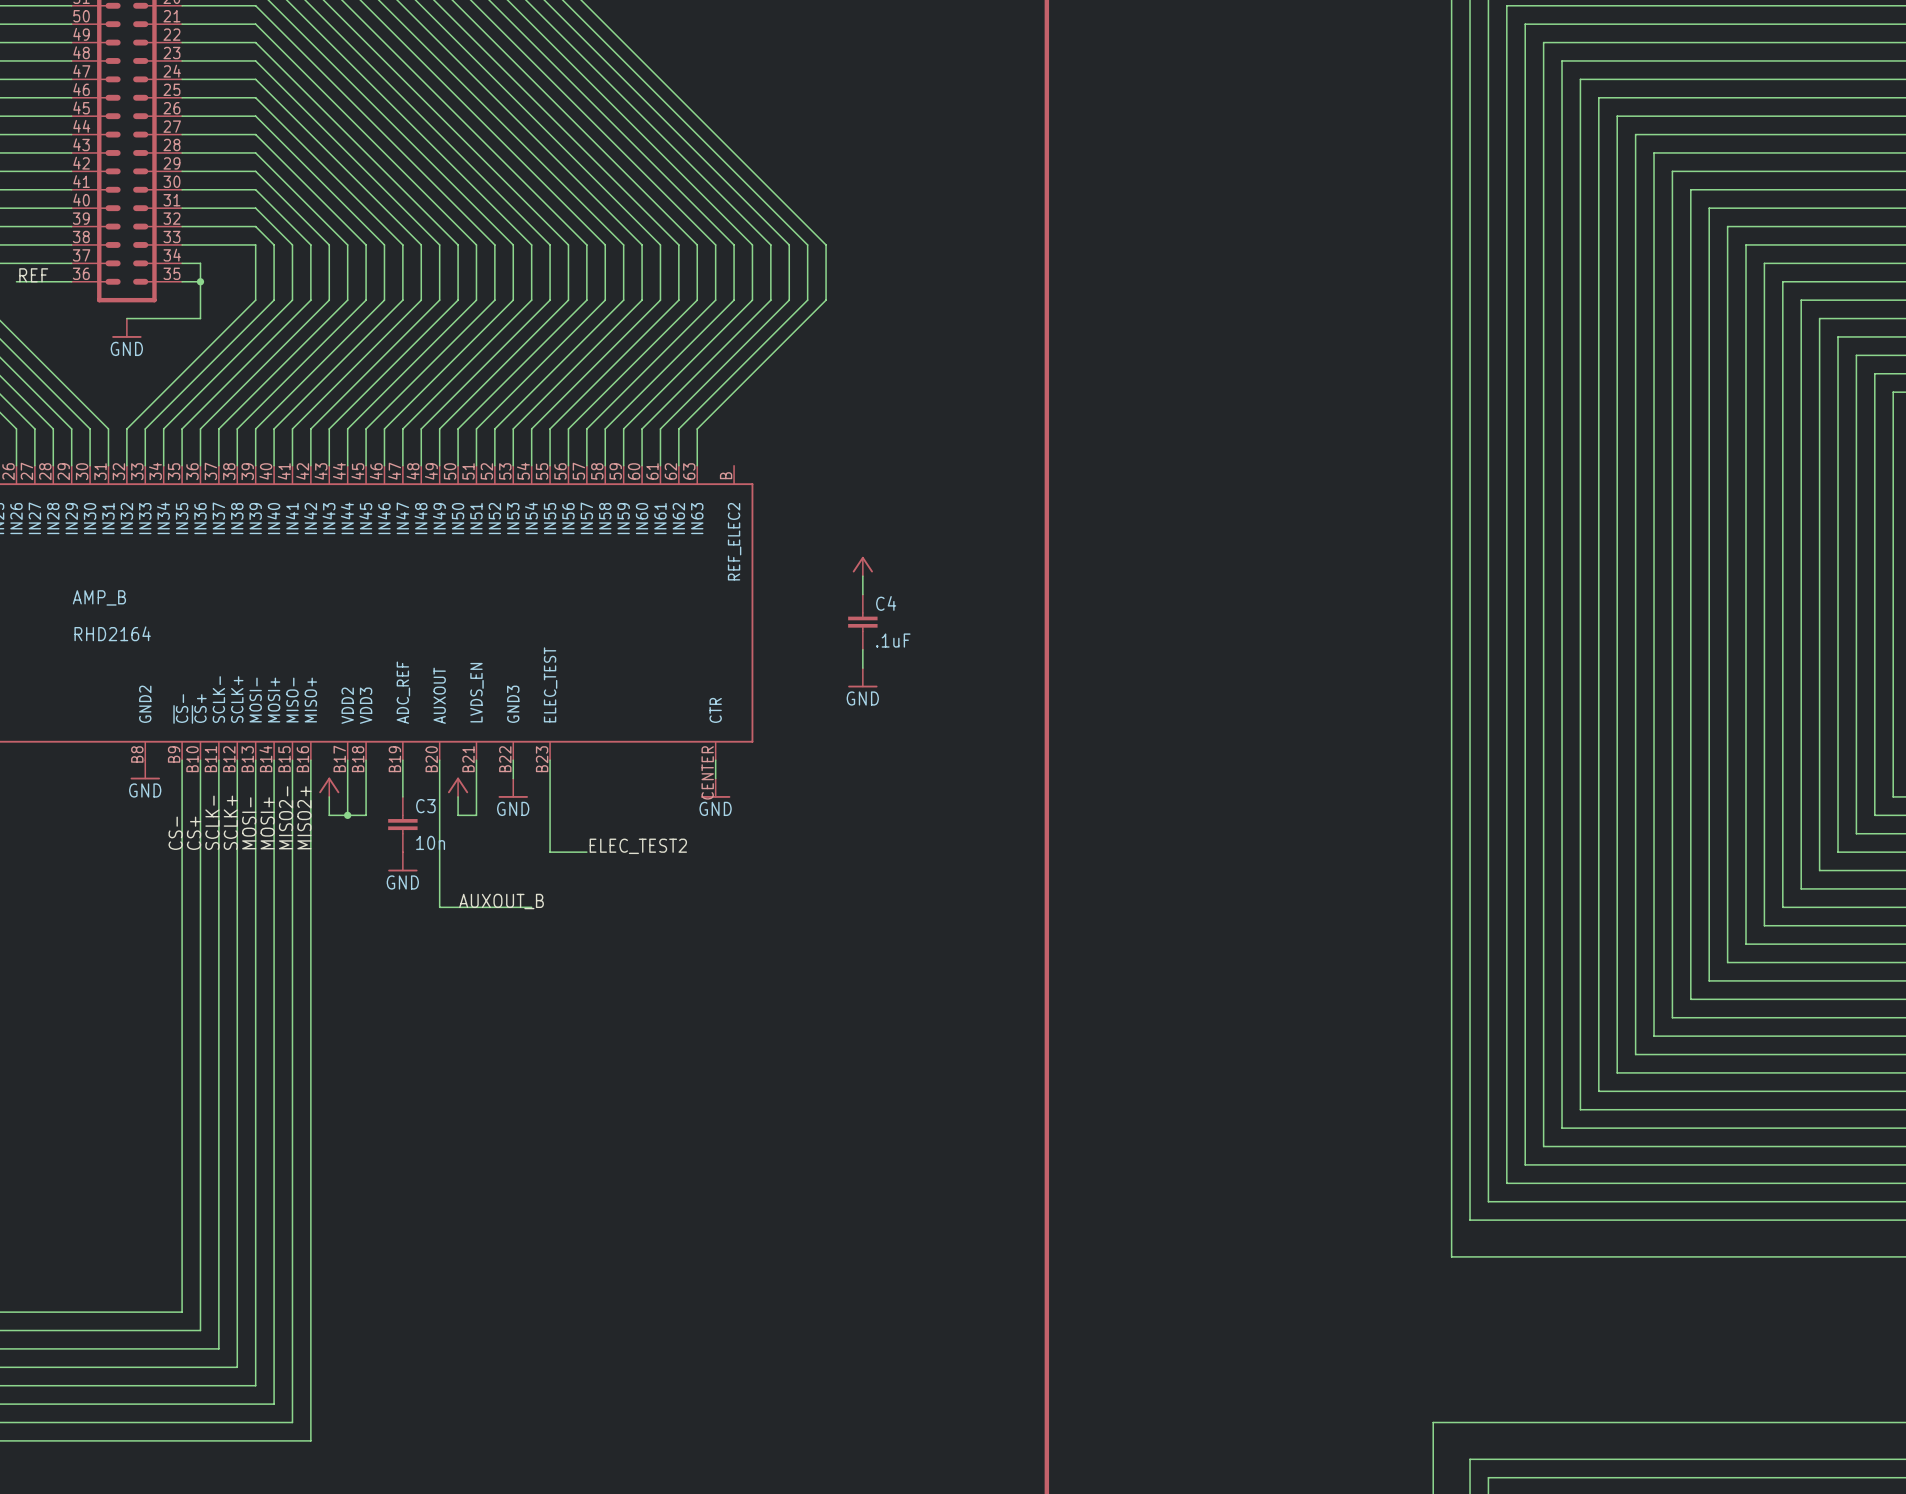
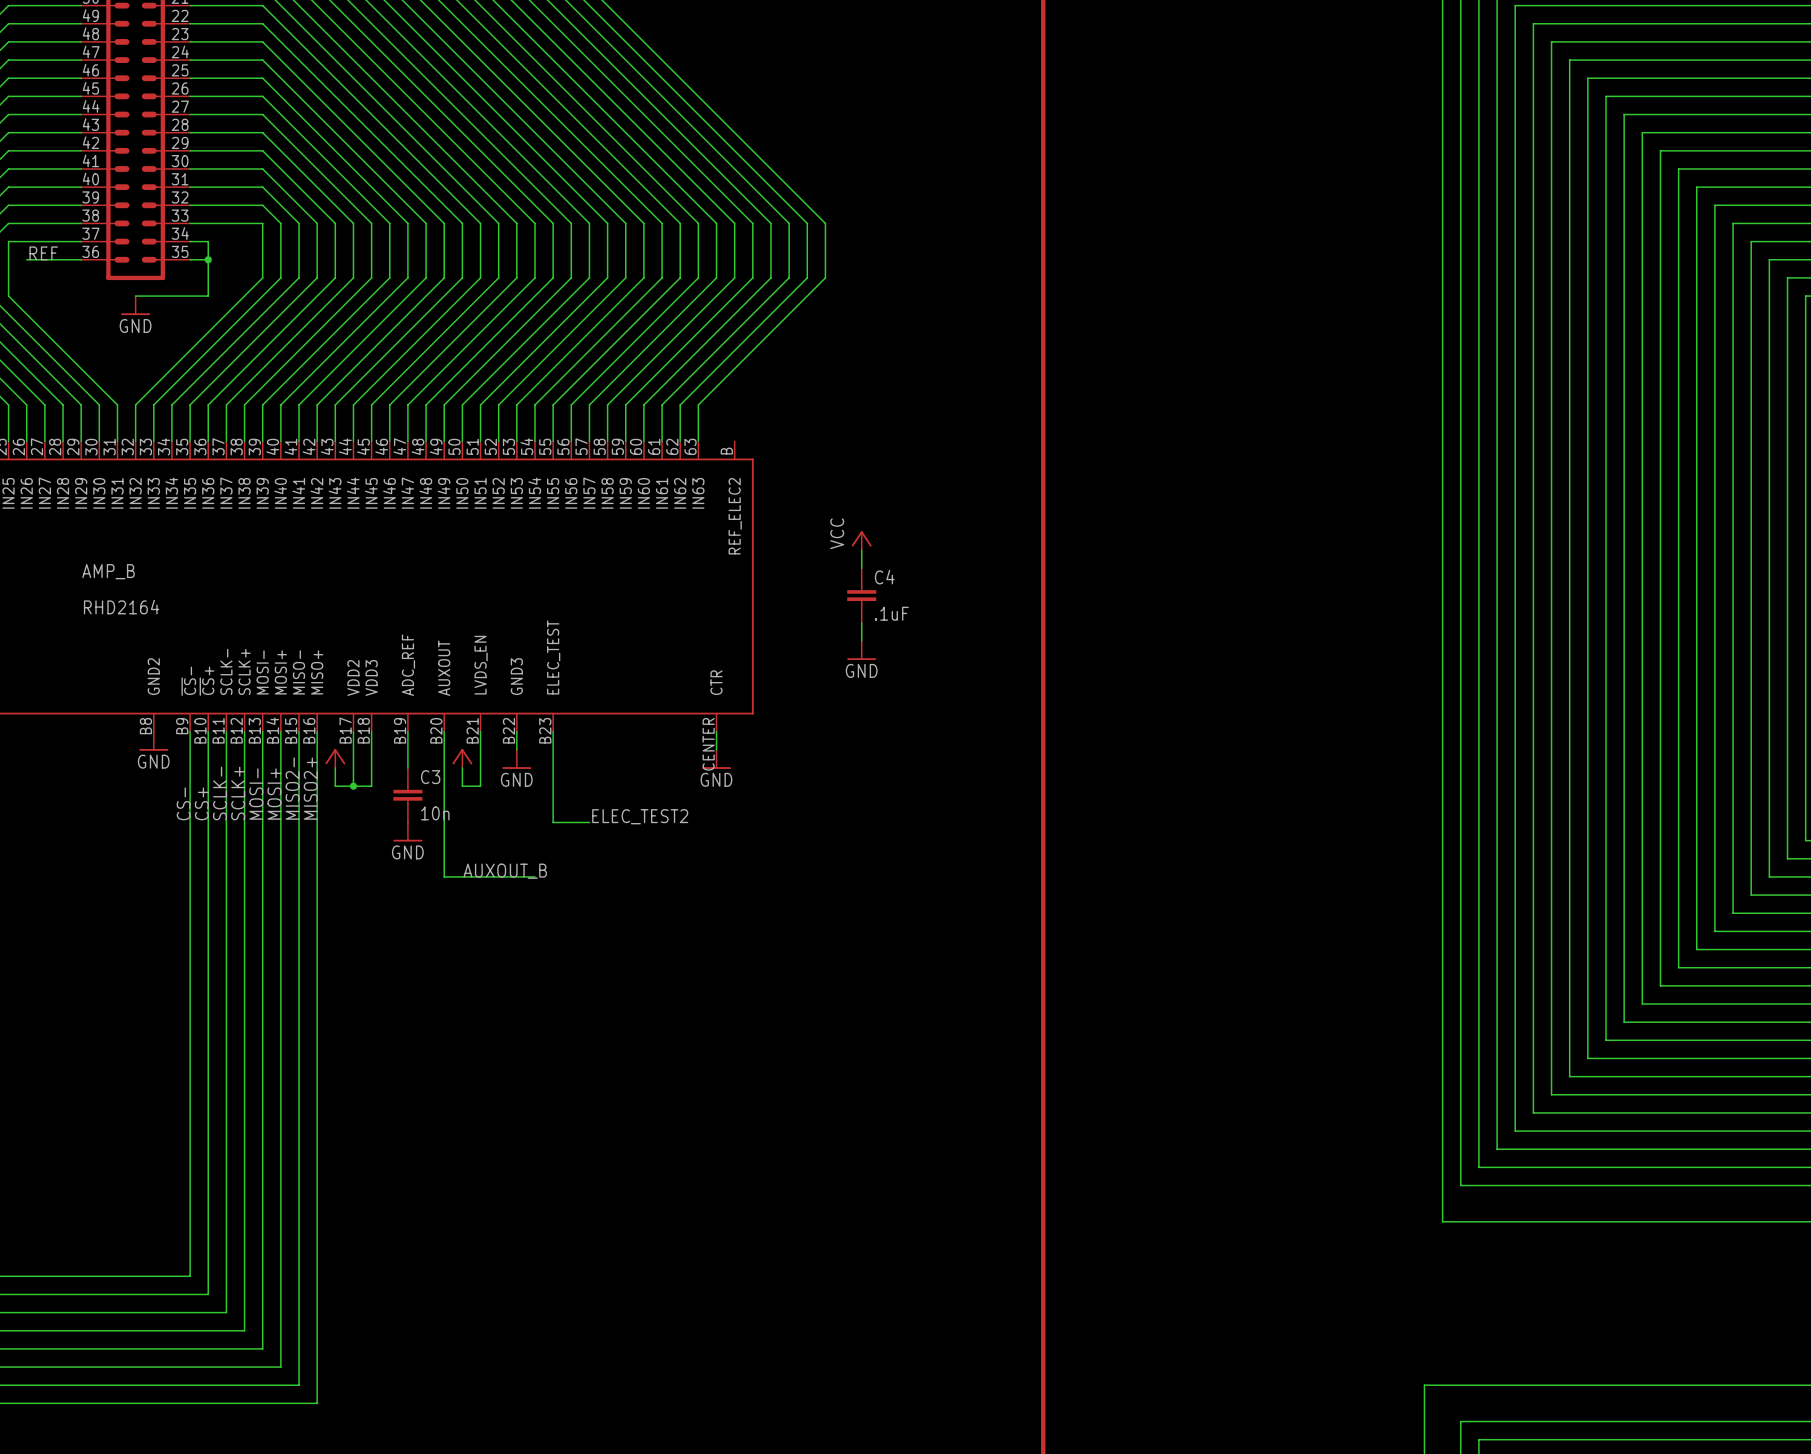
power symbol text: none -> VCC (837, 533)

